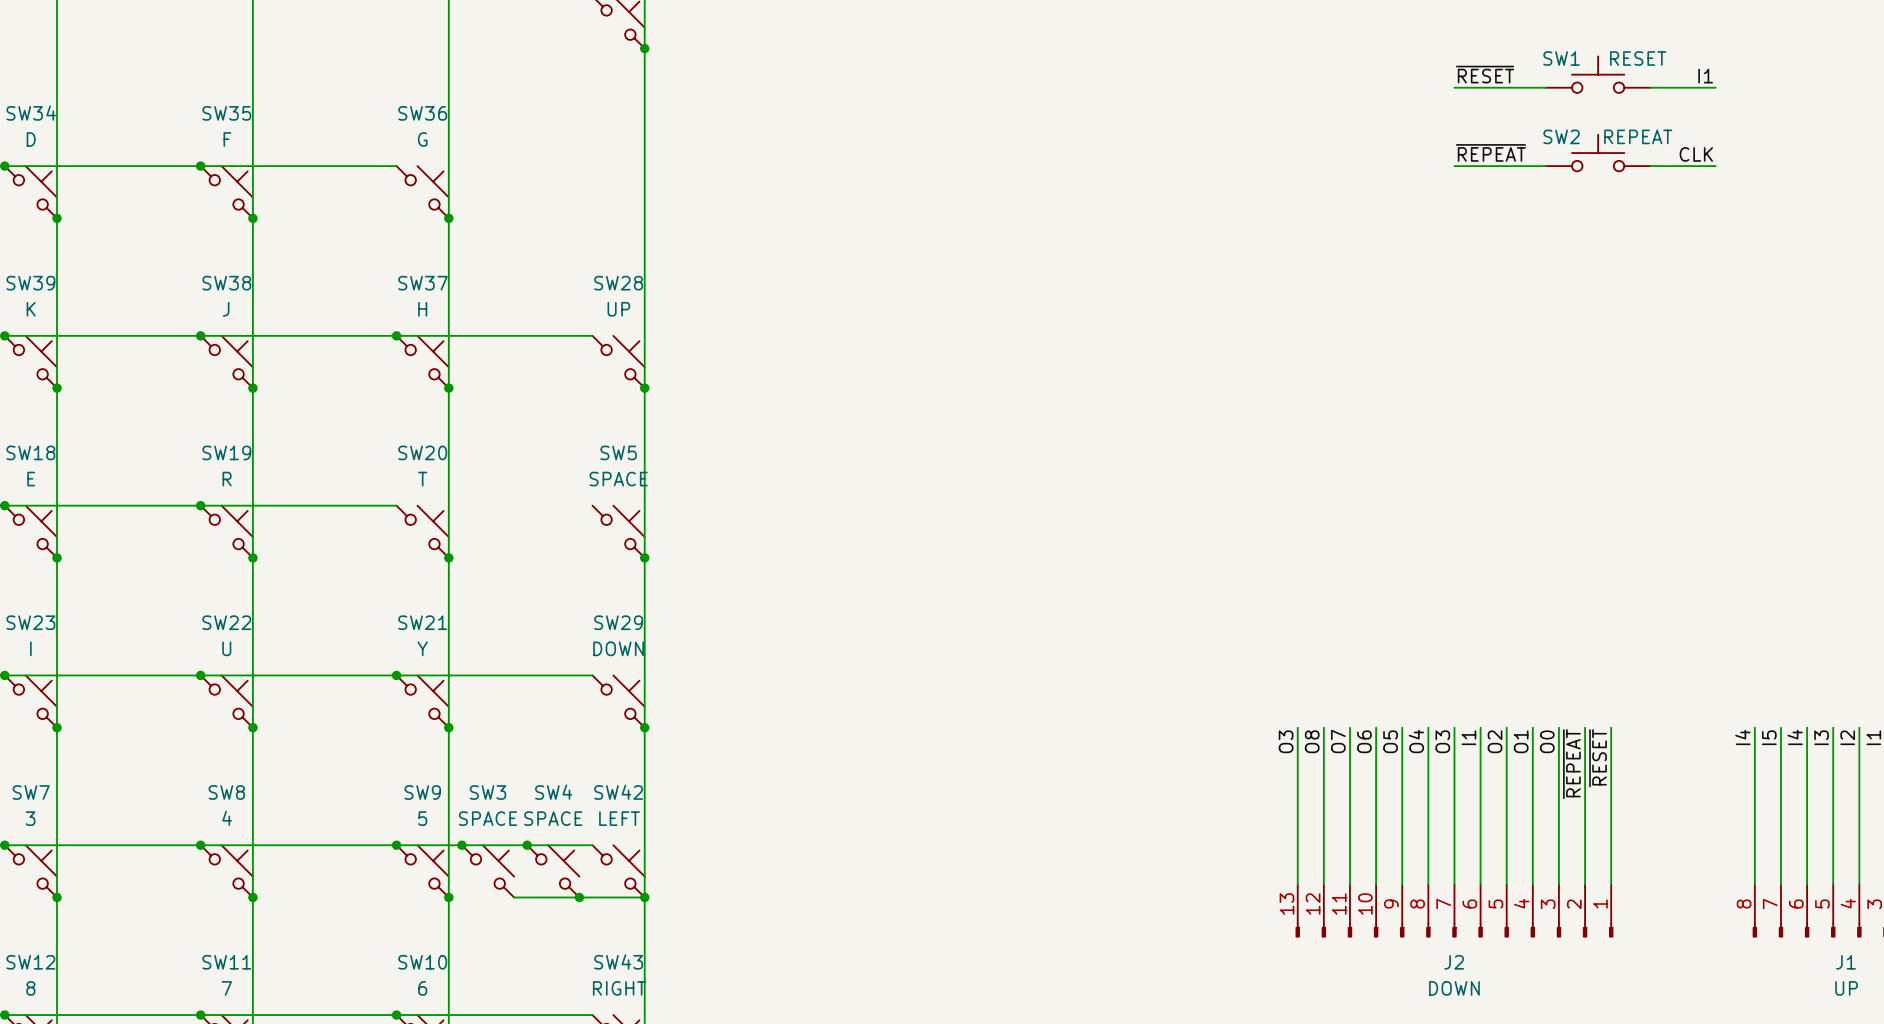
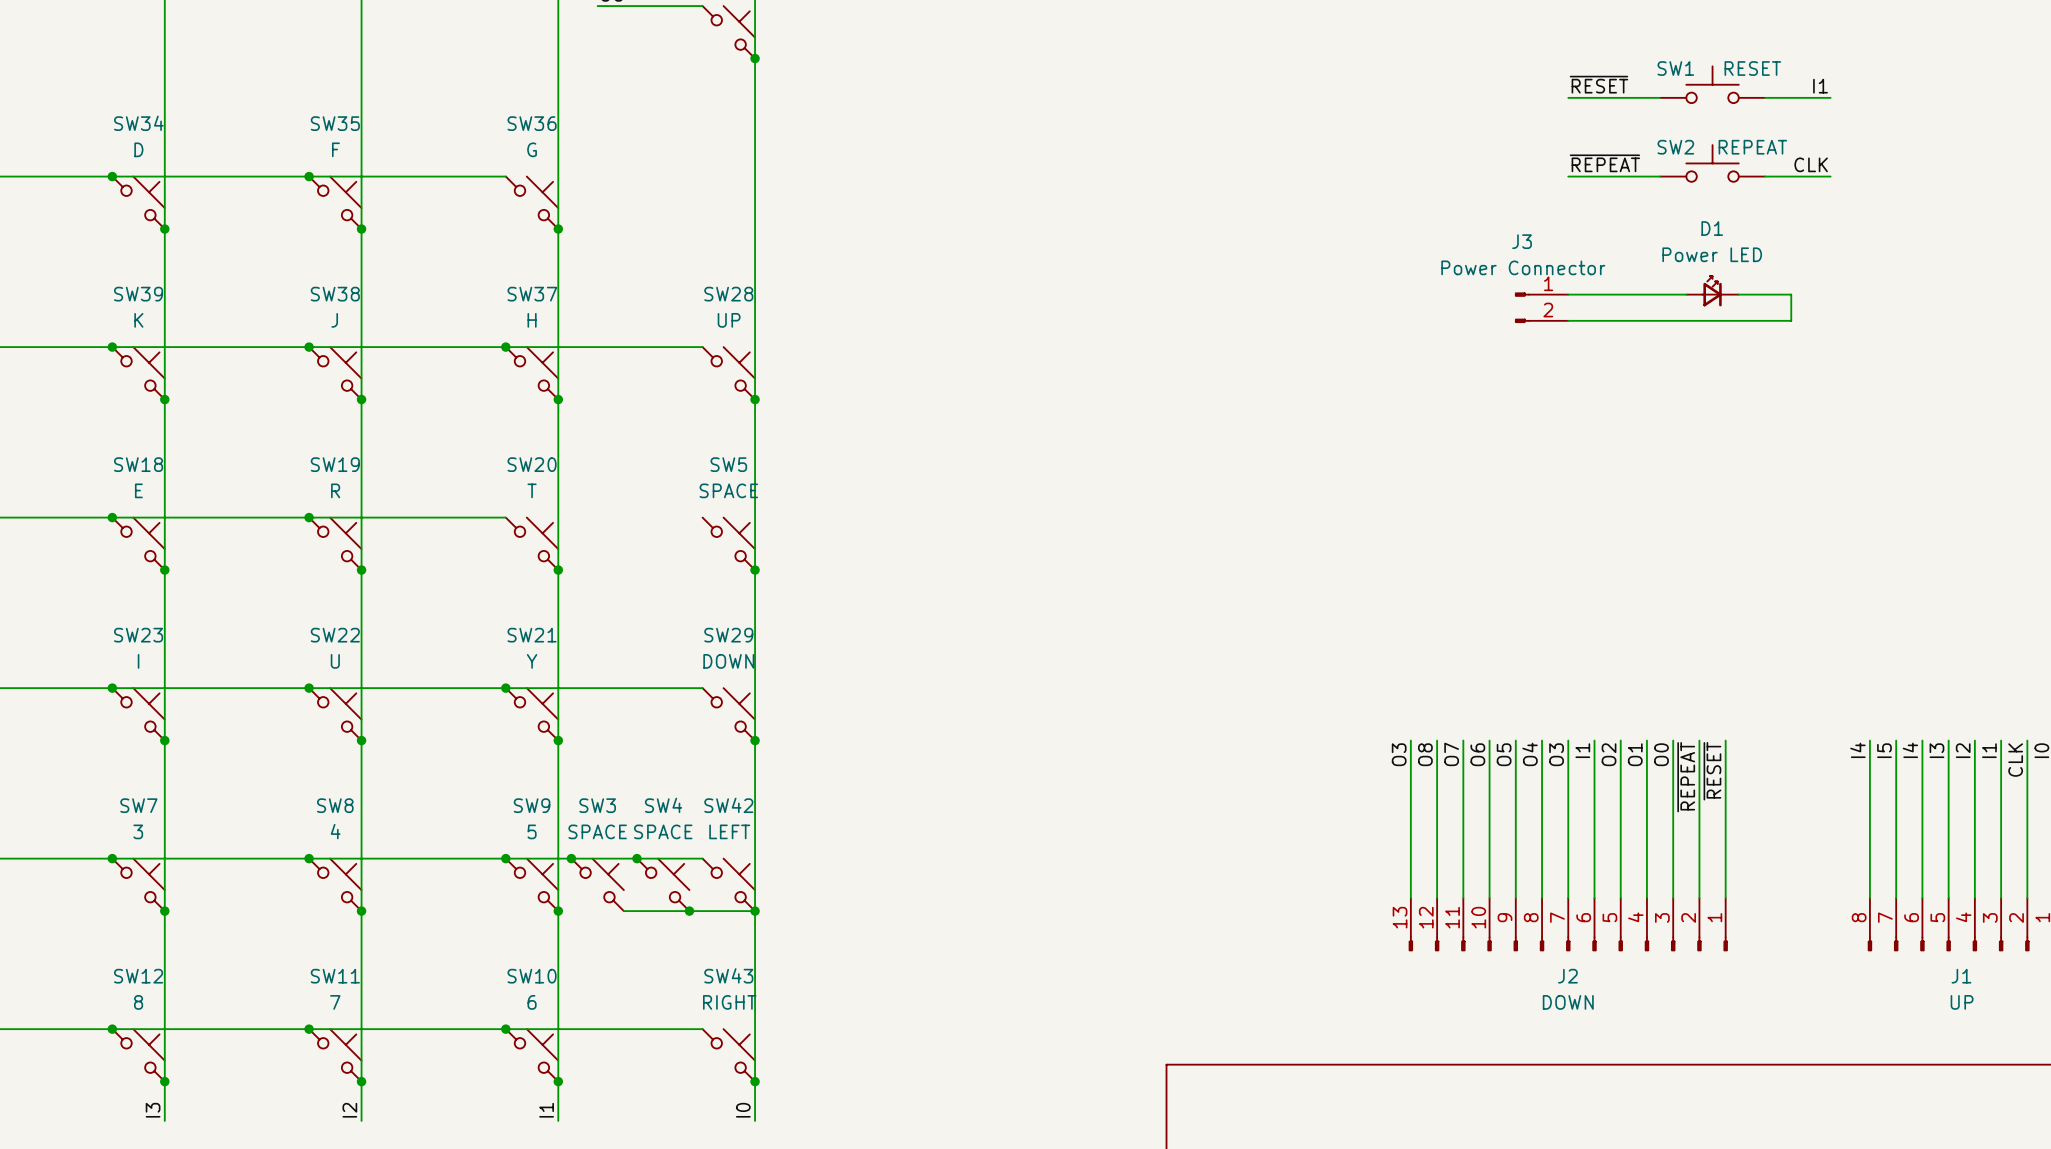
D1: none -> Power LED (1712, 291)
wire: none -> (1568, 294) (1686, 294)
wire: none -> (1738, 294) (1791, 294) (1791, 320) (1568, 320)
J3: none -> Power Connector (1541, 307)

